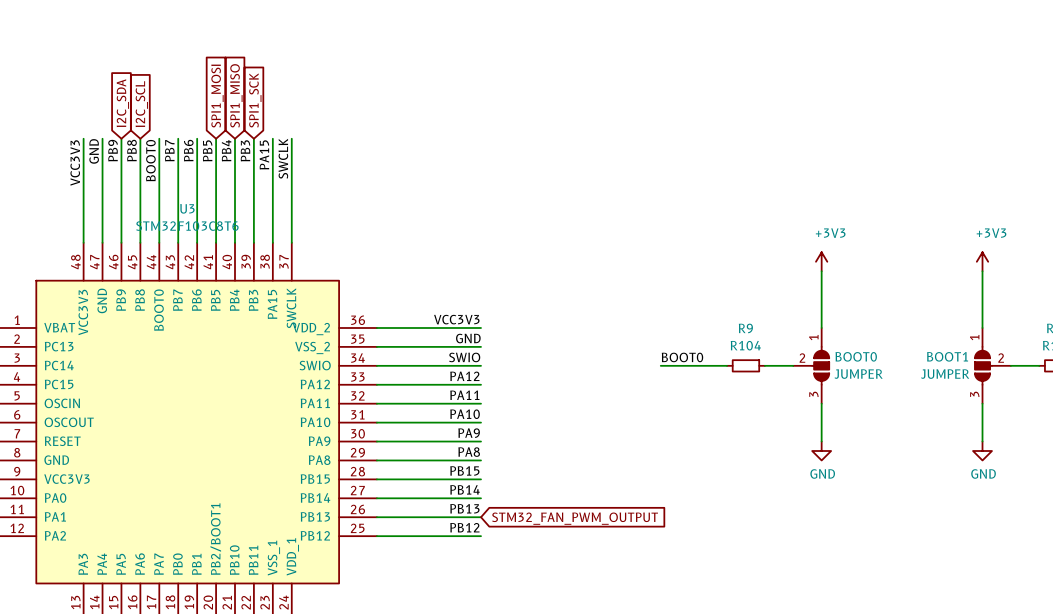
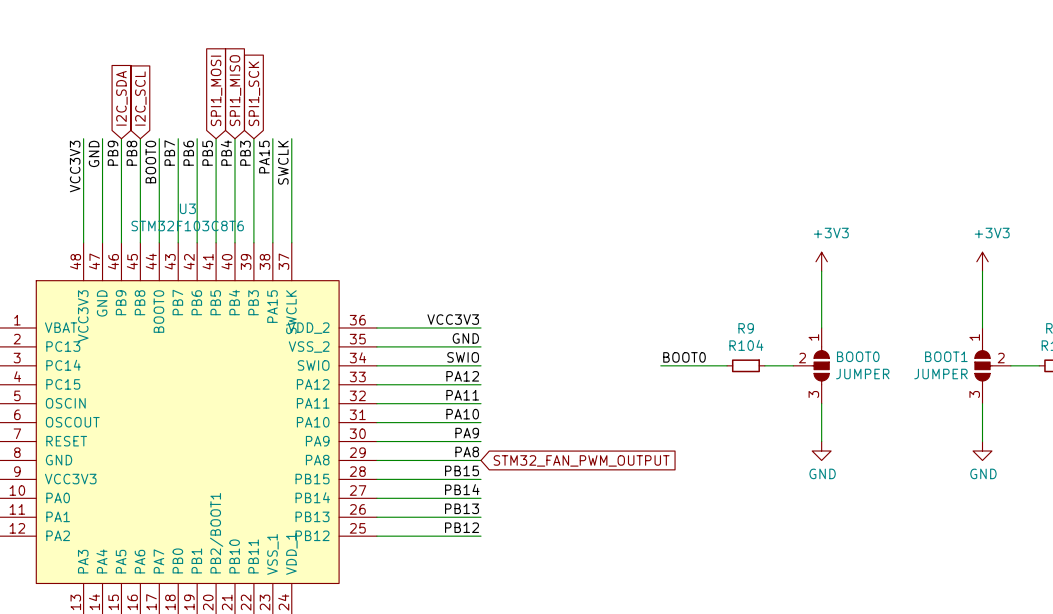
global label position: STM32_FAN_PWM_OUTPUT (575, 518) -> STM32_FAN_PWM_OUTPUT (581, 460)

